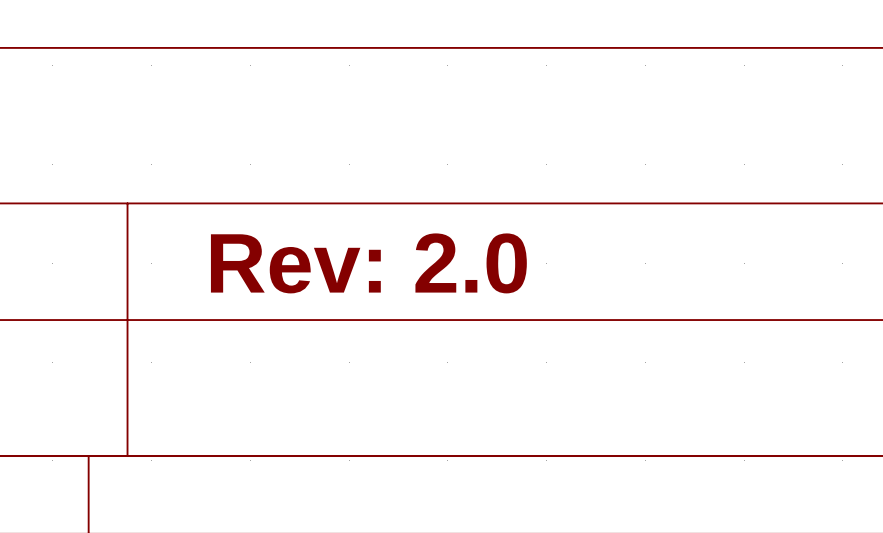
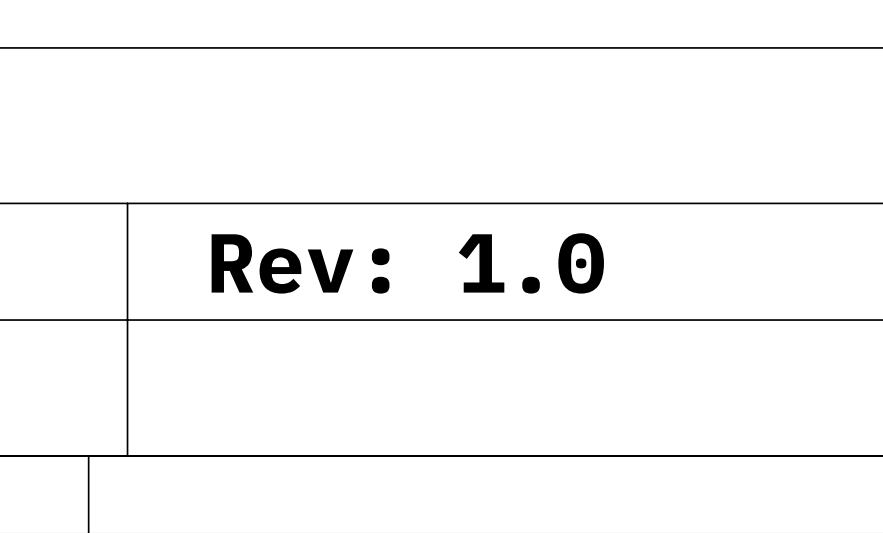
title block: Rev: 2.0 (368, 263) -> Rev: 1.0 (407, 263)

